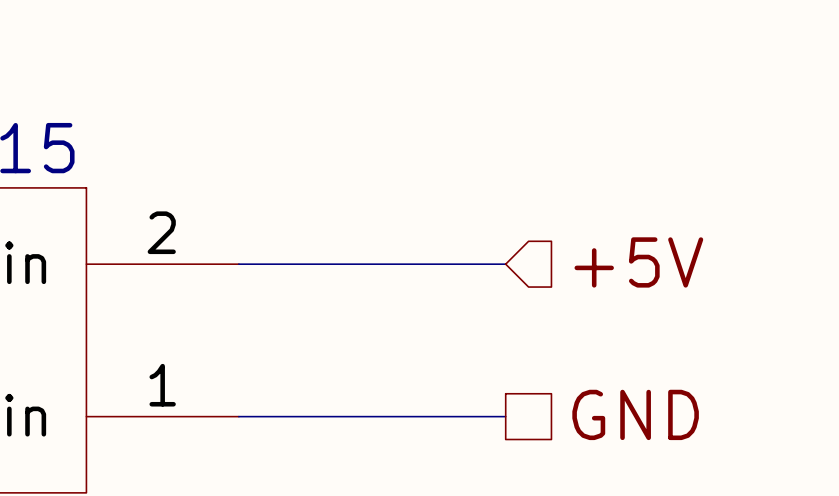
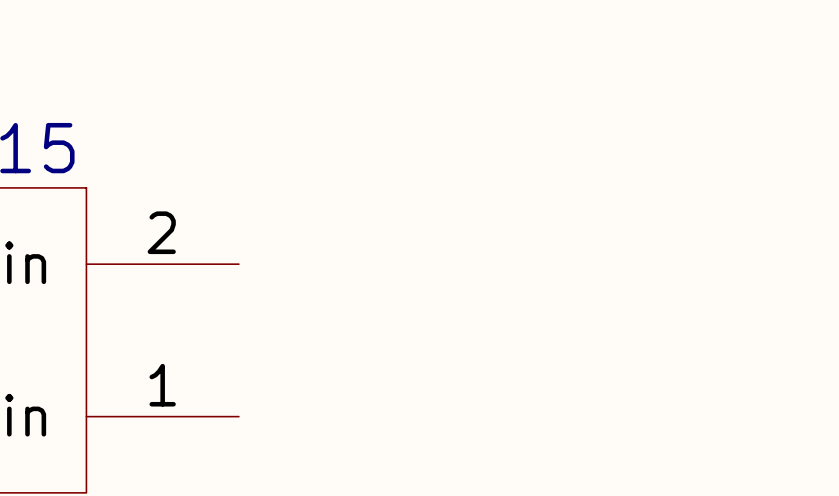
hierarchical label: +5V (638, 262) -> none
wire: (238, 264) (505, 264) -> none
hierarchical label: GND (635, 414) -> none
wire: (238, 416) (505, 416) -> none

